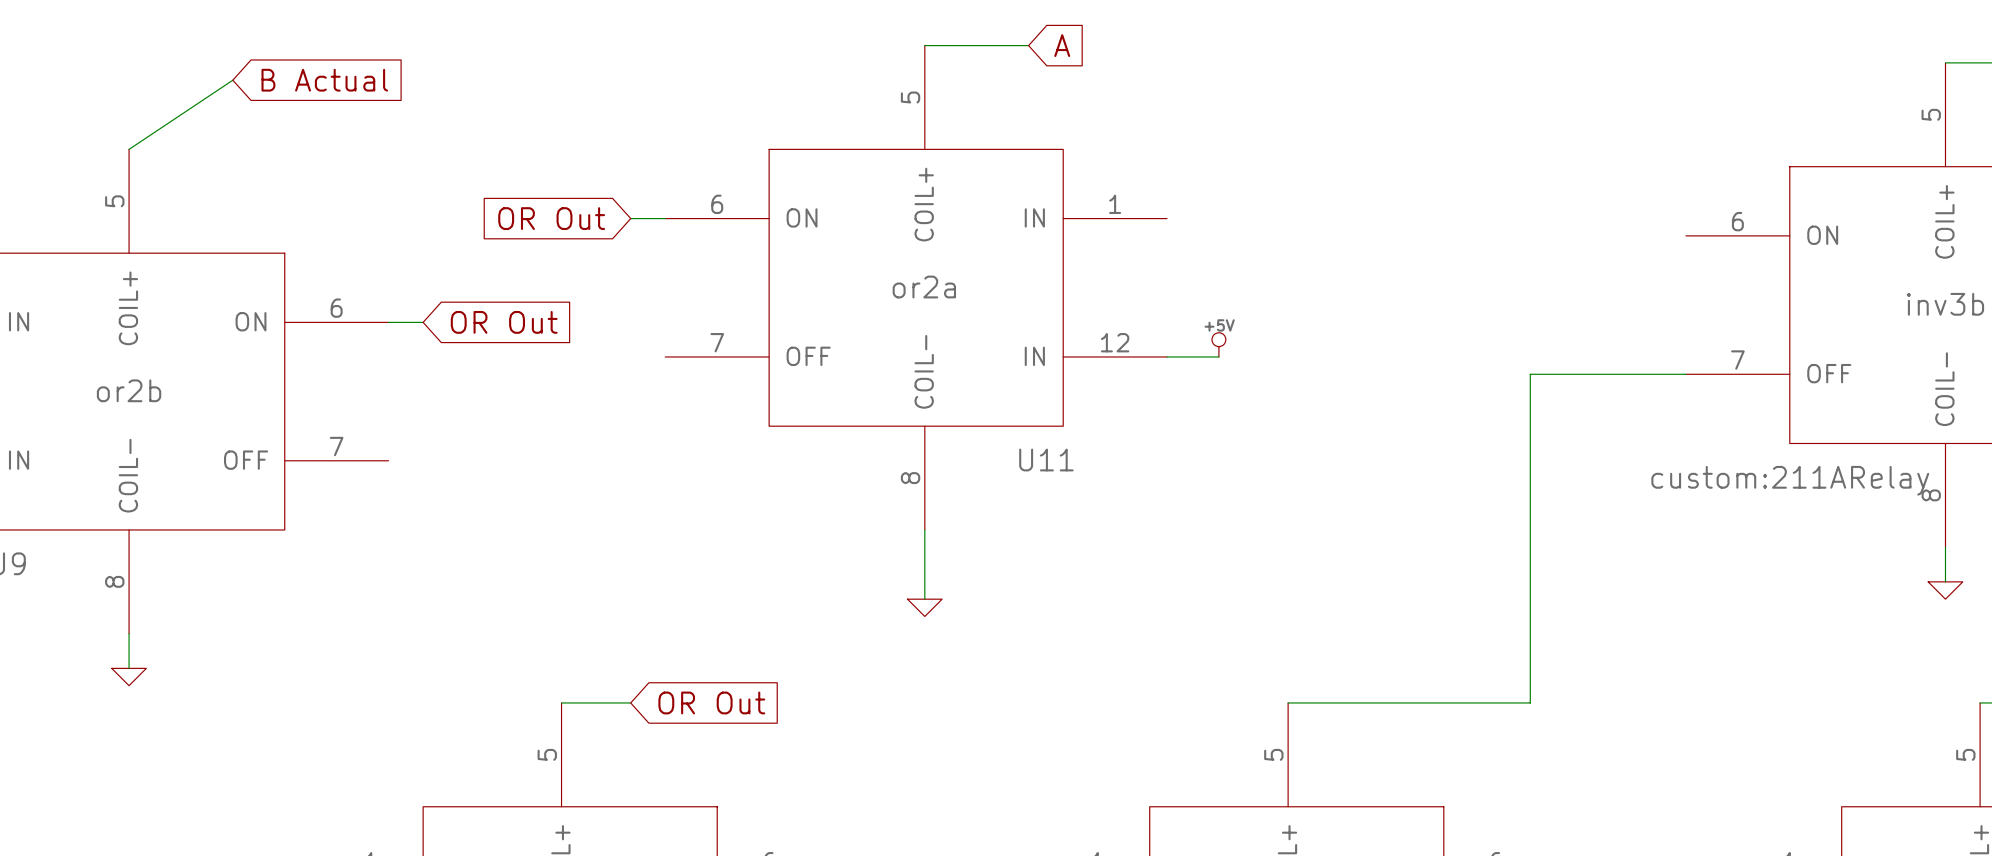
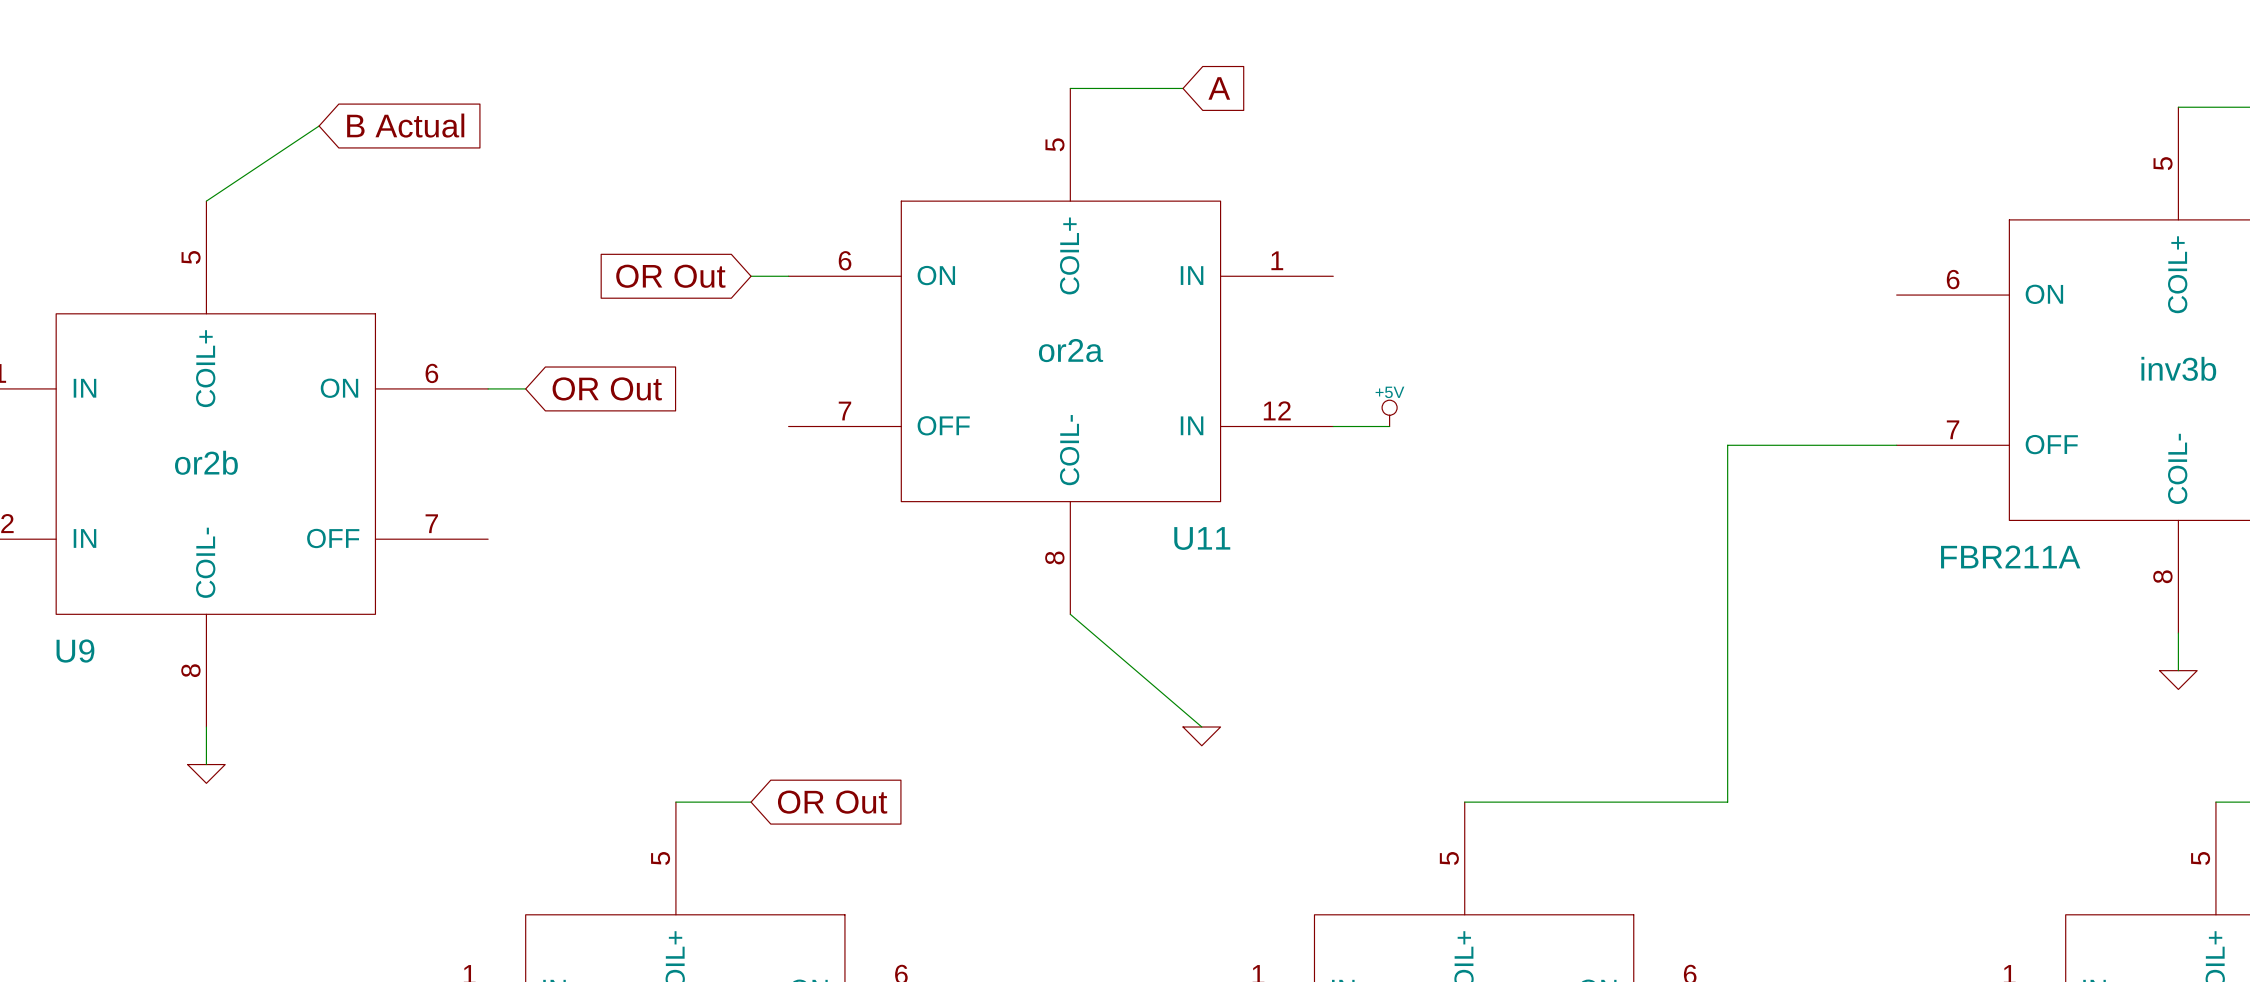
part text: custom:211ARelay (1790, 480) -> FBR211A (2010, 556)
wire: (924, 529) (924, 599) -> (1070, 614) (1201, 727)
power symbol position: (924, 607) -> (1201, 736)

